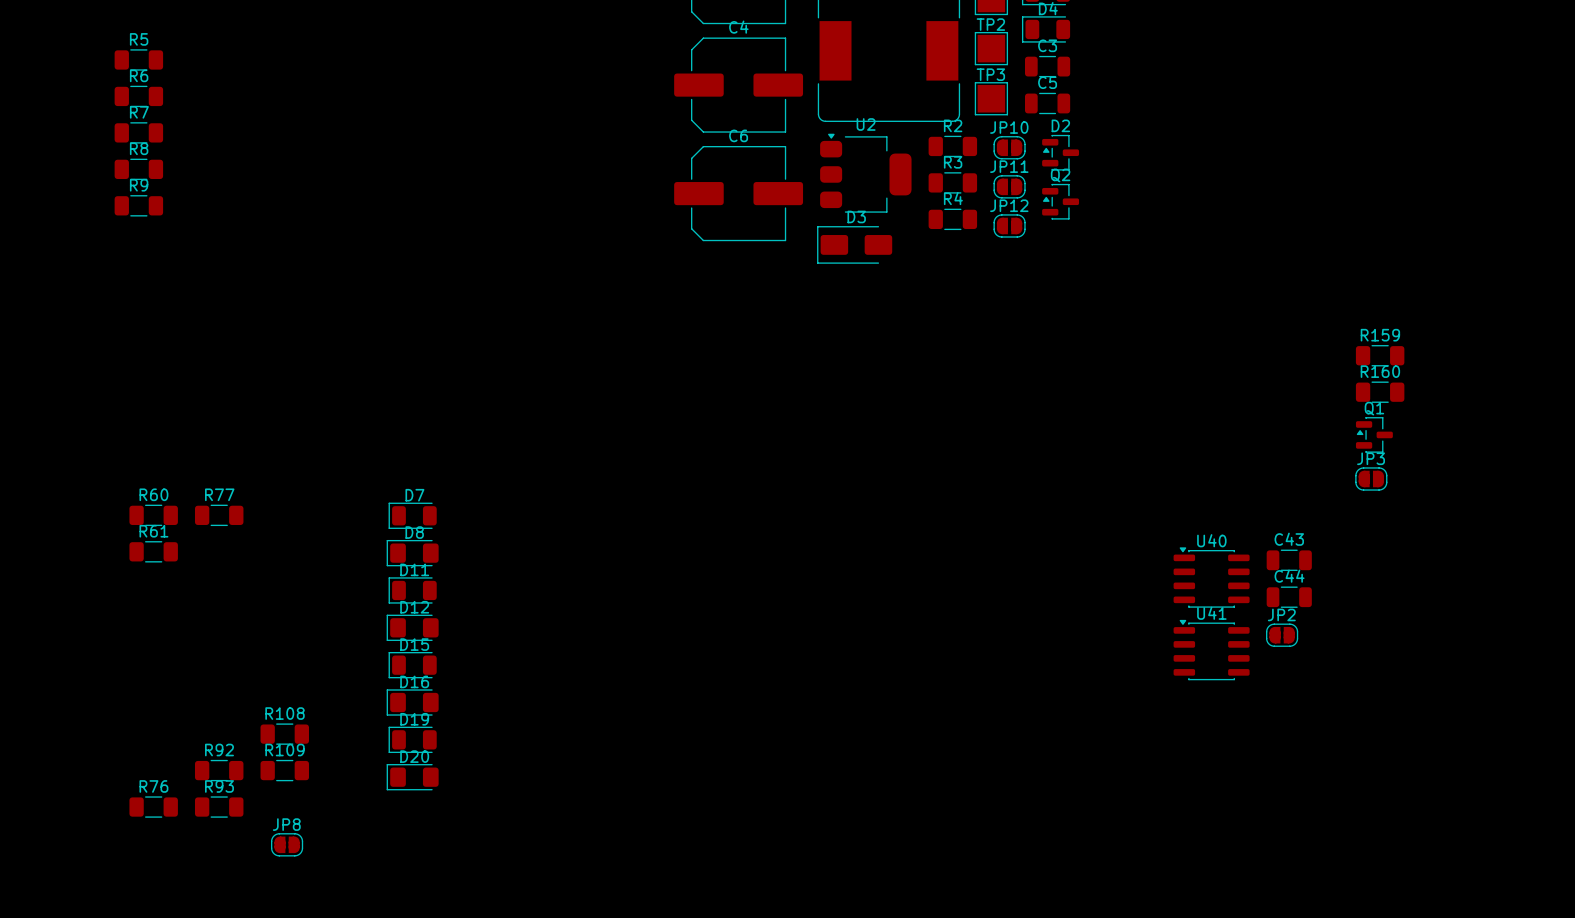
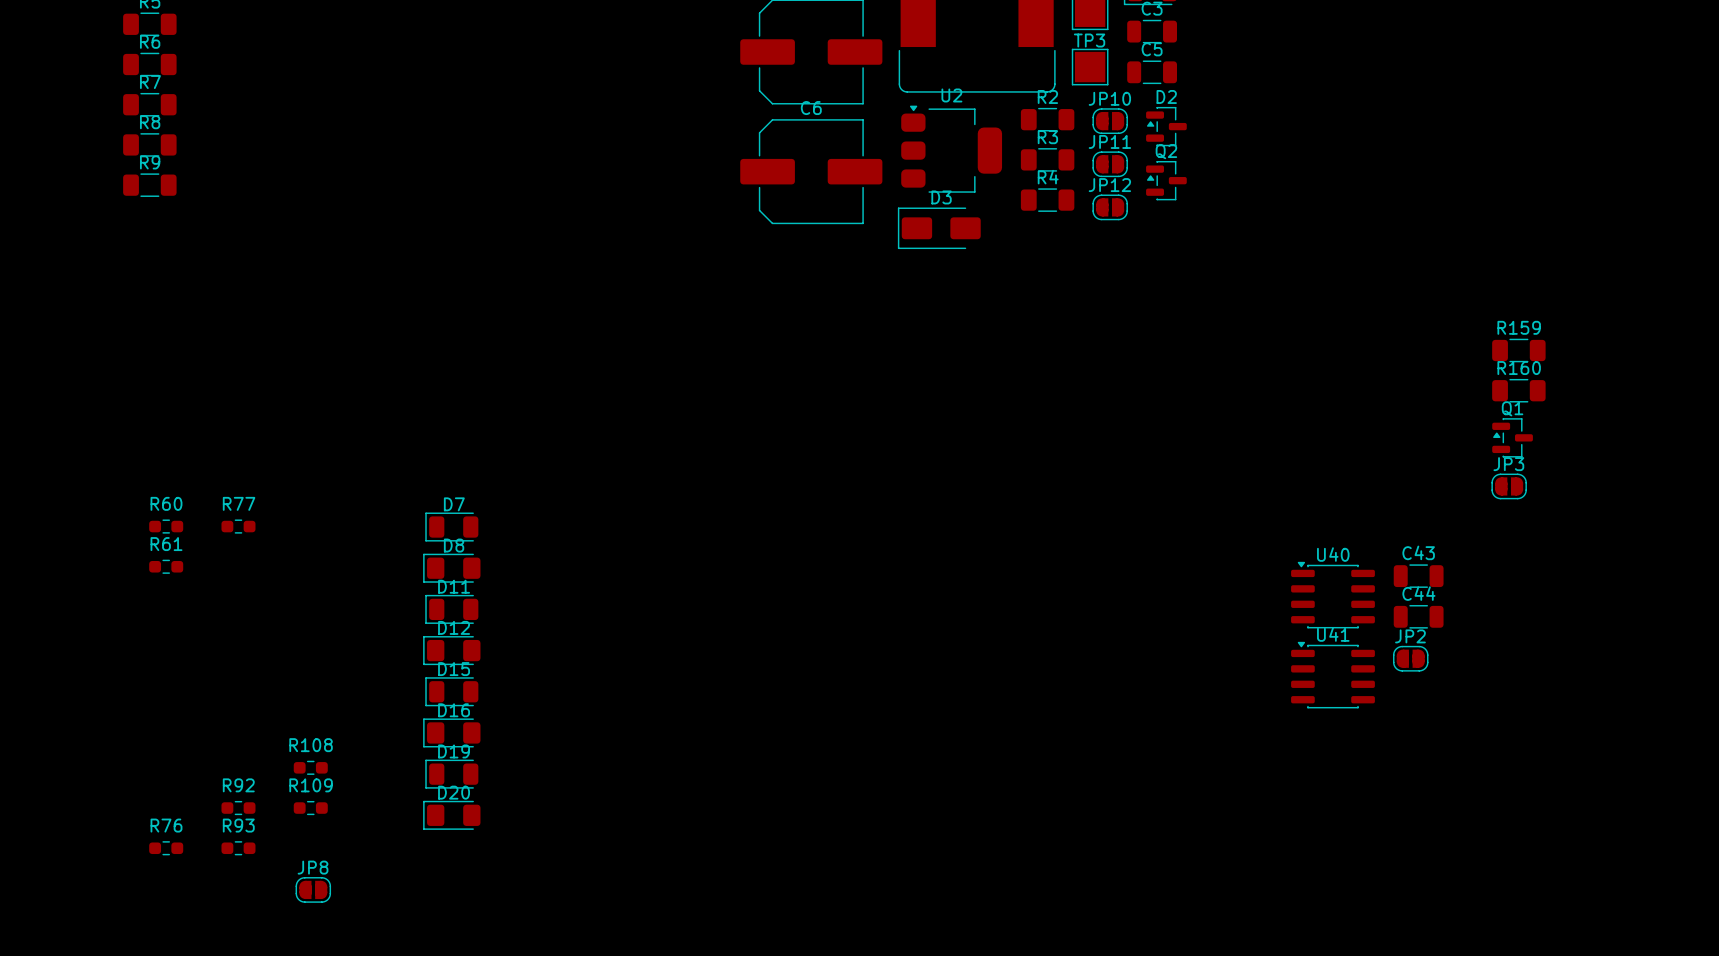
R60 footprint: [129, 504, 178, 527] -> [149, 519, 184, 534]
R77 footprint: [194, 504, 244, 527] -> [221, 519, 256, 534]
R61 footprint: [129, 541, 178, 563] -> [149, 559, 184, 574]
R108 footprint: [260, 723, 309, 745] -> [293, 760, 328, 775]
R92 footprint: [194, 759, 244, 782] -> [221, 800, 256, 816]
R109 footprint: [260, 759, 309, 782] -> [293, 800, 328, 816]
R76 footprint: [129, 796, 178, 818] -> [149, 841, 184, 856]
R93 footprint: [194, 796, 244, 818] -> [221, 841, 256, 856]

